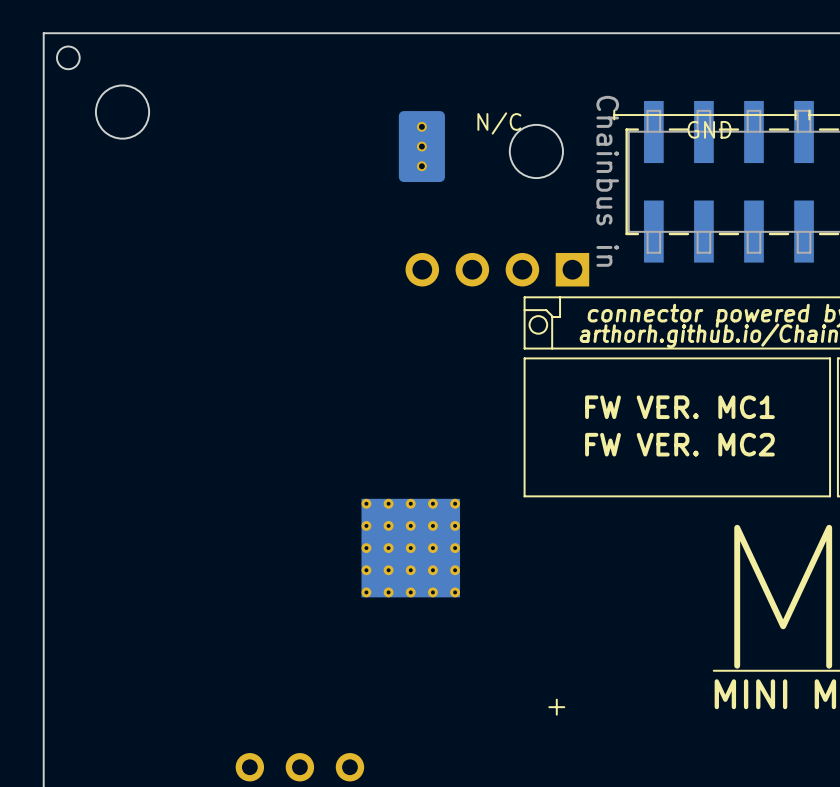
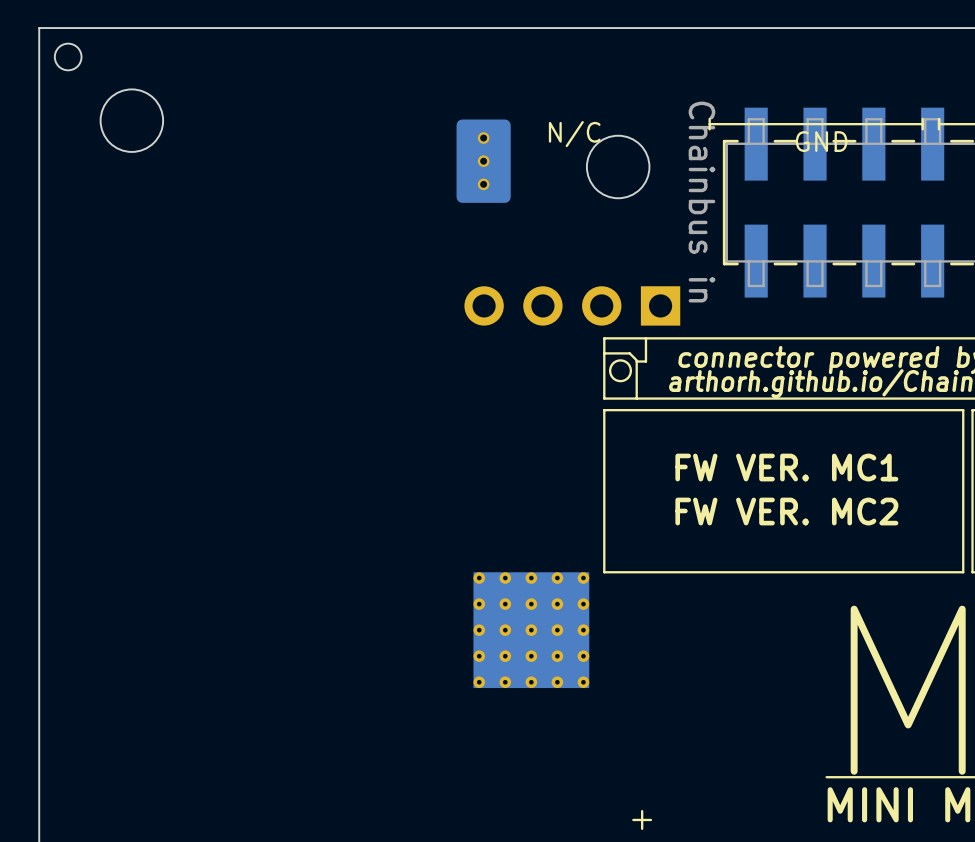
part position: (410, 548) -> (531, 630)

